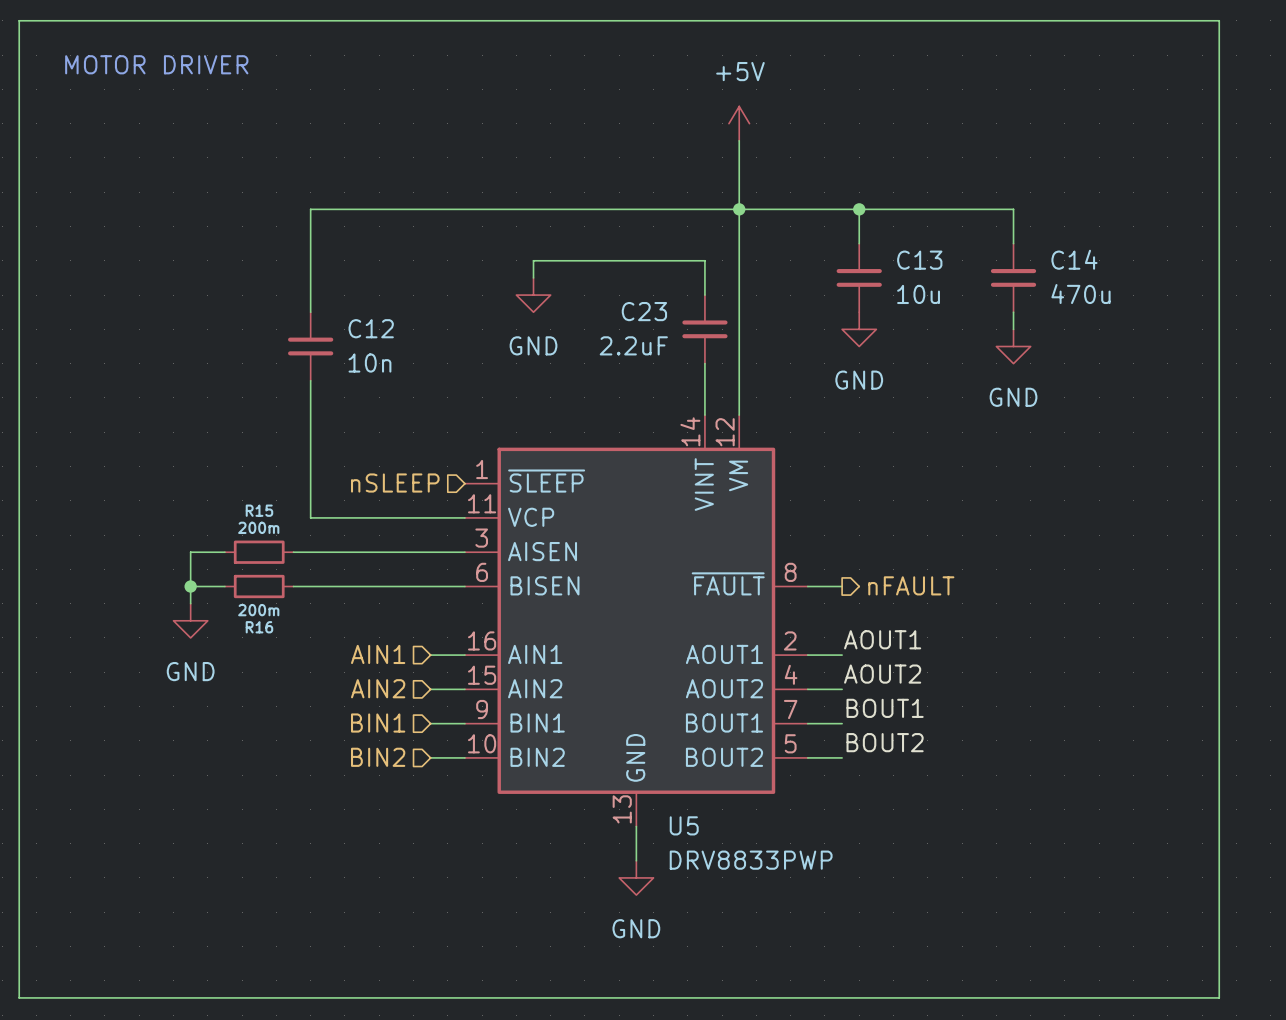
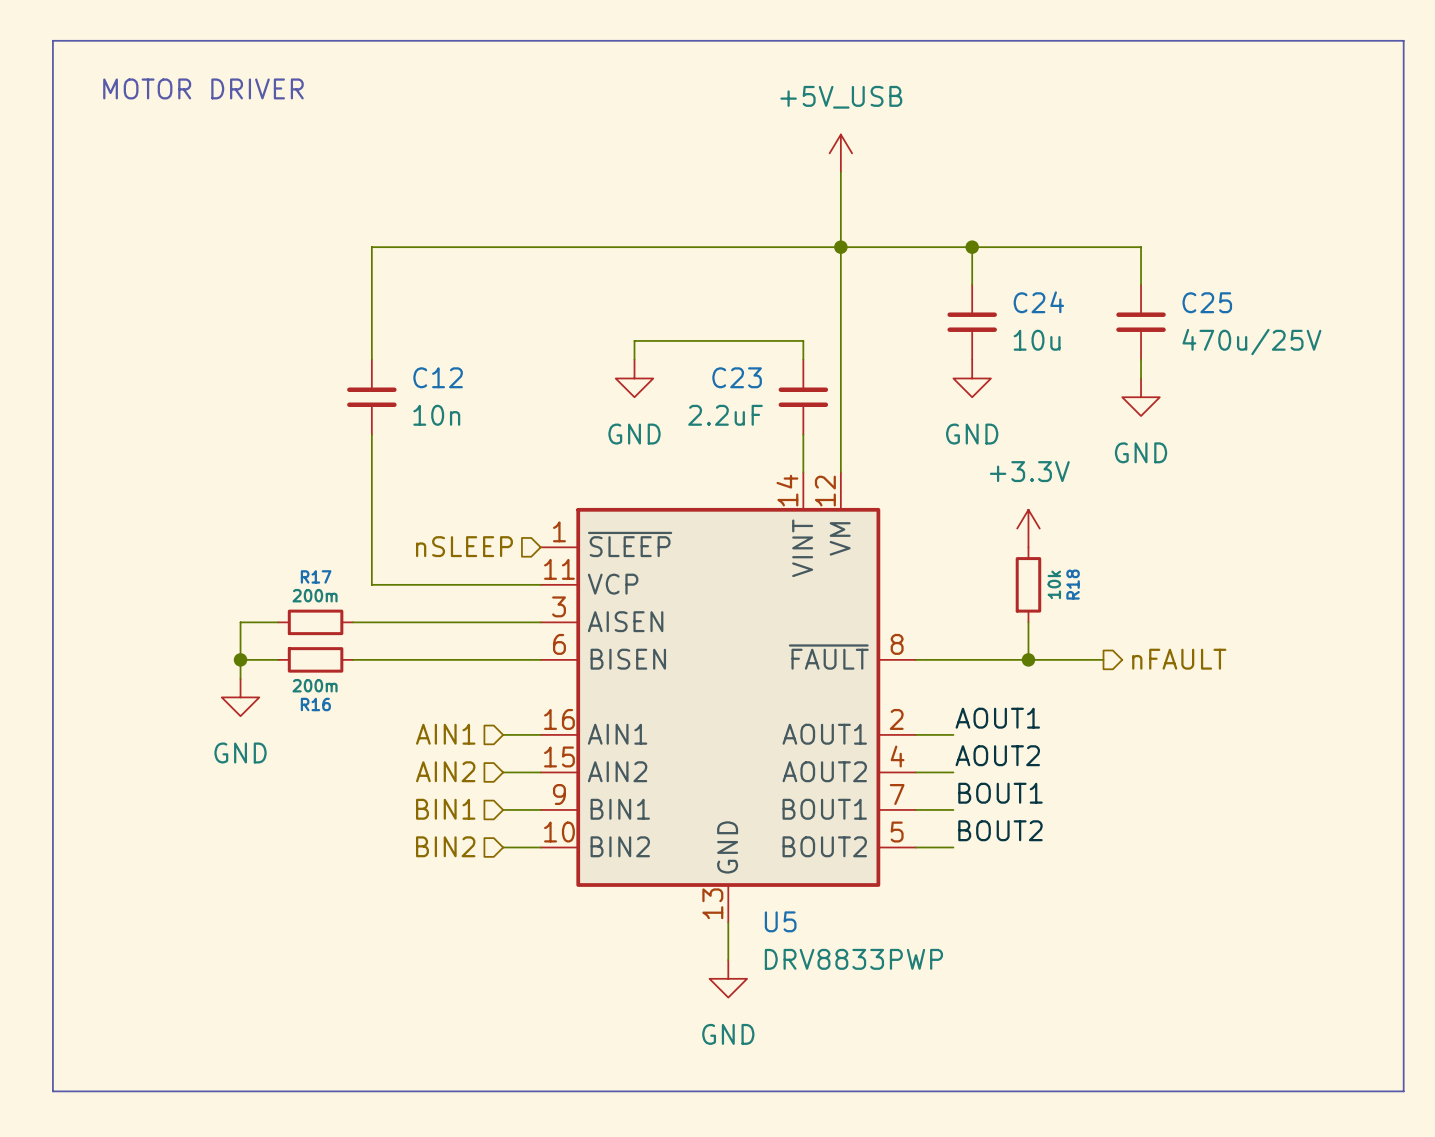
wire: (19, 20) (1219, 20) (1219, 997) (19, 997) (19, 20) -> none
line: none -> (52, 40) (1403, 40) (1403, 1091) (52, 1091) (52, 40)
power symbol: +5V (739, 123) -> +5V_USB (840, 153)
C14 name: C14 (1074, 259) -> C25 (1207, 302)
C13 name: C13 (919, 260) -> C24 (1038, 302)
wire: (533, 277) (533, 260) (704, 260) (704, 295) -> none
C14 value: 470u (1081, 294) -> 470u/25V (1251, 342)
power symbol position: GND (533, 295) -> GND (634, 378)
wire: none -> (634, 359) (634, 340) (803, 340) (803, 359)
C23 position: (704, 329) -> (803, 397)
power symbol: none -> +3.3V (1028, 528)
R15 name: R15 (259, 510) -> R17 (316, 576)
R18: none -> 10k (1028, 584)
wire: none -> (1028, 622) (1028, 659)
hierarchical label position: nFAULT (911, 585) -> nFAULT (1179, 659)
wire: none -> (953, 659) (1103, 659)
junction: none -> (1028, 659)

